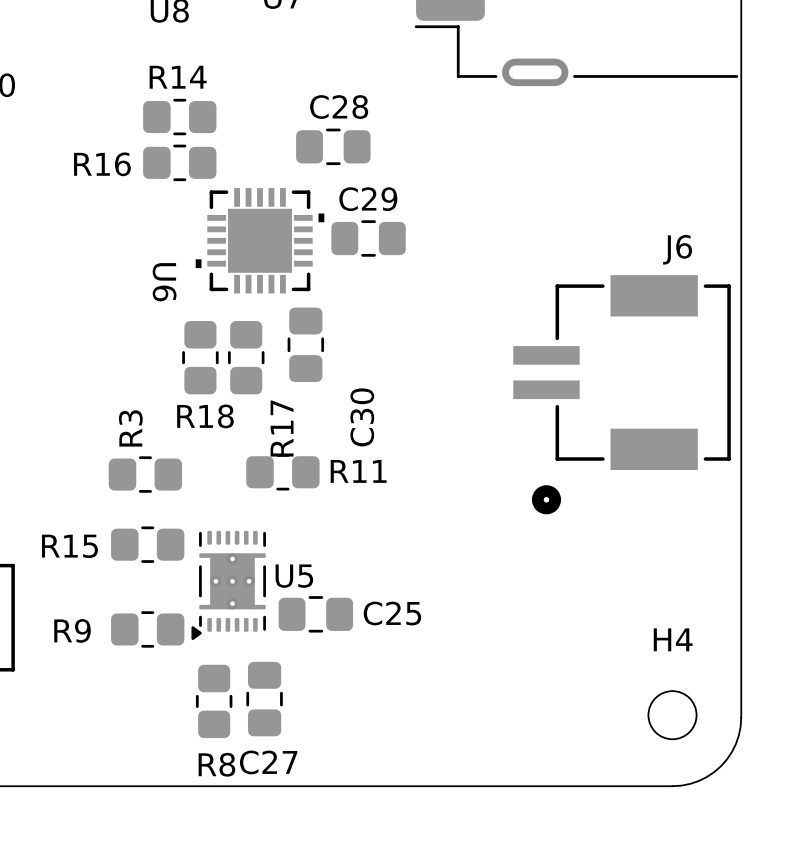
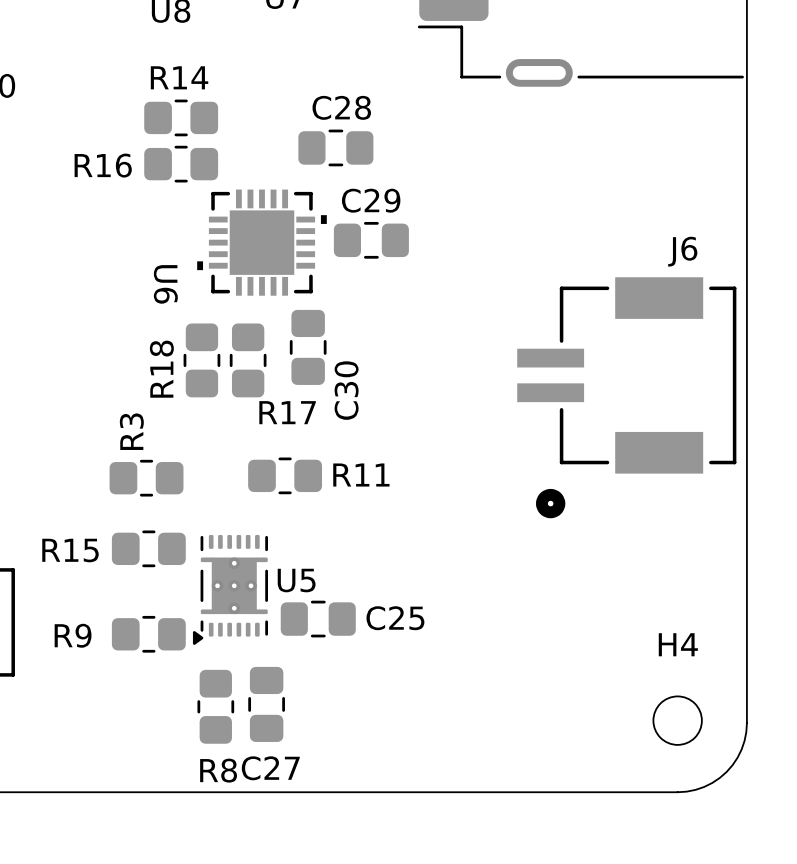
R18 name rotation: 0° (205, 416) -> 90° counterclockwise (161, 369)
C30 name position: C30 (362, 417) -> C30 (346, 390)
R17 name rotation: 0° (282, 428) -> 90° clockwise (287, 412)

